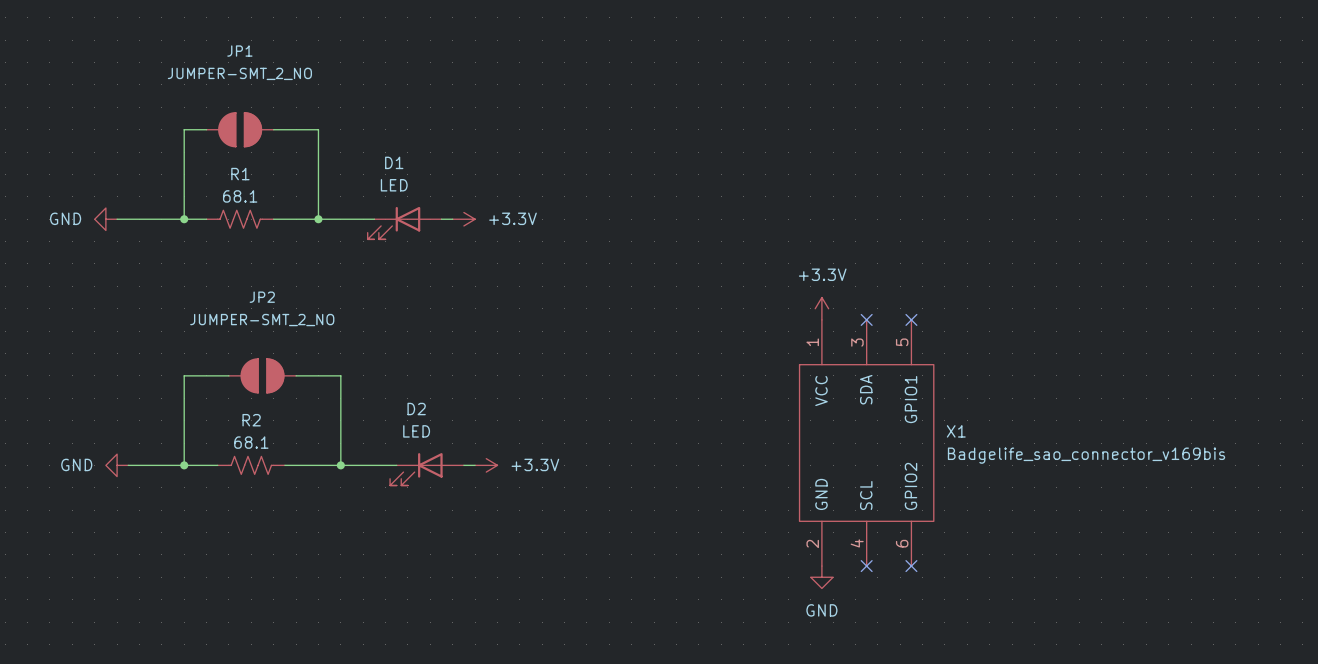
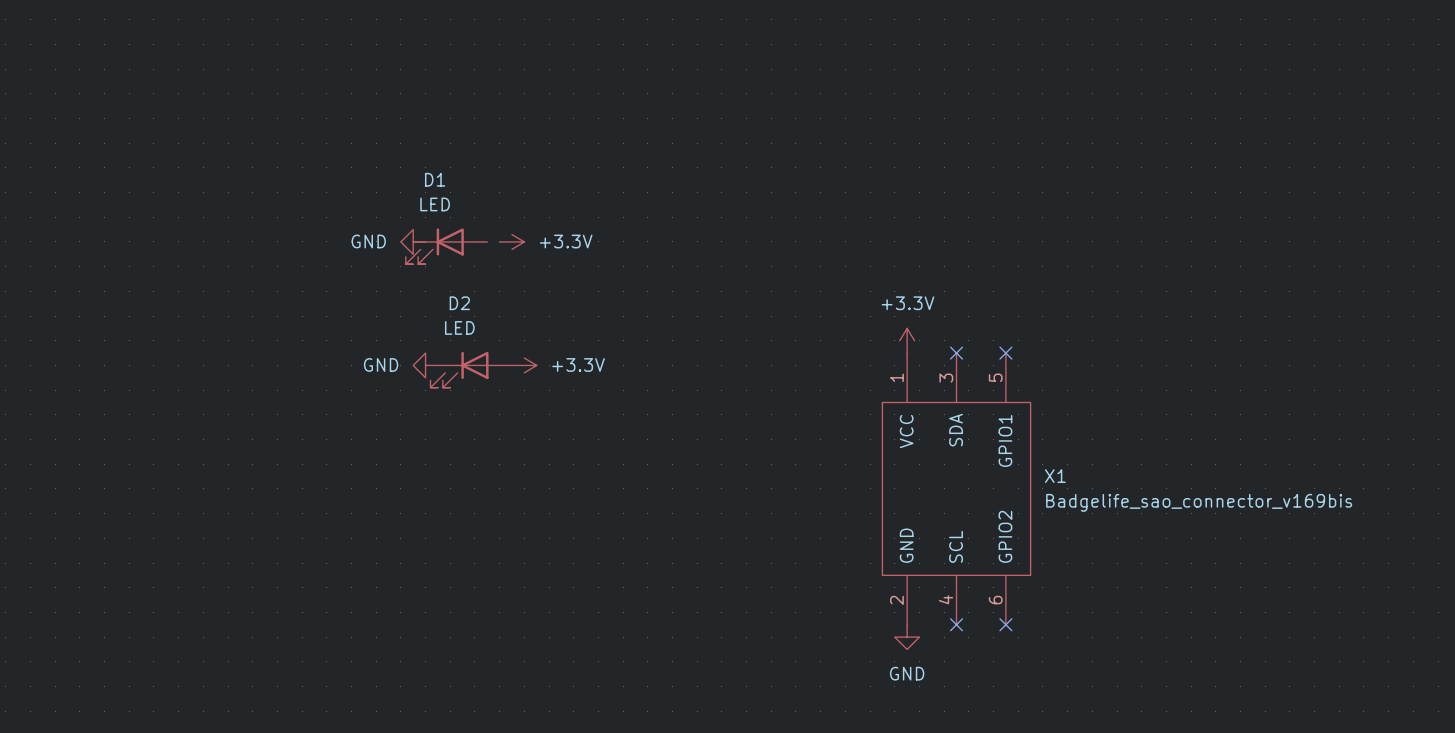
wire: (206, 129) (184, 129) (184, 219) -> none
JP1: JUMPER-SMT_2_NO (240, 129) -> none
wire: (273, 129) (318, 129) (318, 219) -> none
power symbol: GND (105, 219) -> none
wire: (117, 219) (206, 219) -> none
junction: (184, 219) -> none
R1: 68.1 (240, 219) -> none
wire: (273, 219) (374, 219) -> none
junction: (318, 219) -> none
power symbol: none -> GND (413, 241)
wire: (441, 219) (452, 219) -> none
power symbol: none -> GND (425, 365)
wire: (228, 375) (184, 375) (184, 465) -> none
JP2: JUMPER-SMT_2_NO (262, 375) -> none
wire: (296, 375) (340, 375) (340, 465) -> none
power symbol: GND (117, 465) -> none
wire: (128, 465) (217, 465) -> none
junction: (184, 465) -> none
R2: 68.1 (251, 465) -> none
wire: (284, 465) (396, 465) -> none
junction: (340, 465) -> none
wire: (463, 465) (475, 465) -> none
power symbol position: +3.3V (486, 465) -> +3.3V (524, 365)
D2 position: (426, 469) -> (471, 369)

